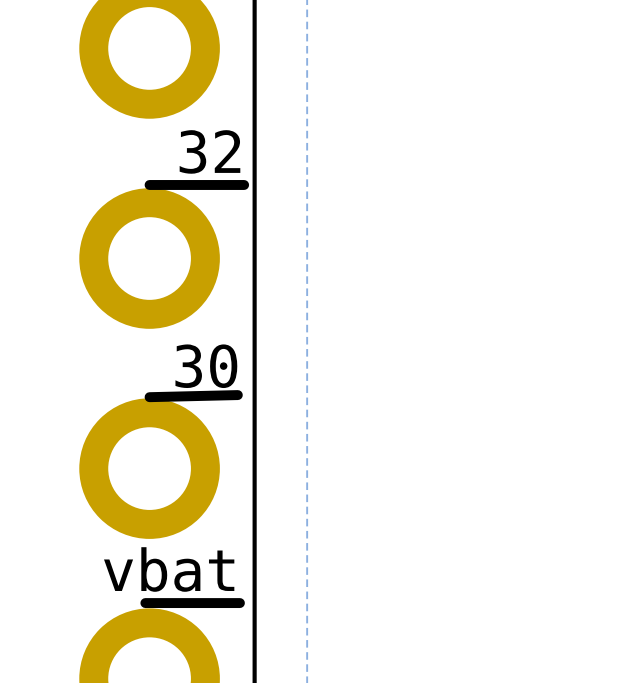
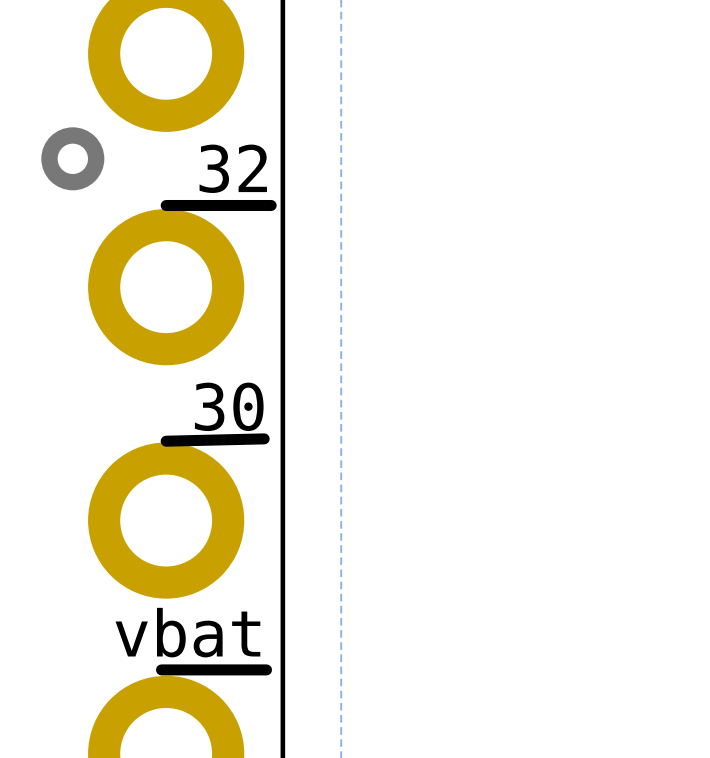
via: none -> (72, 158)

